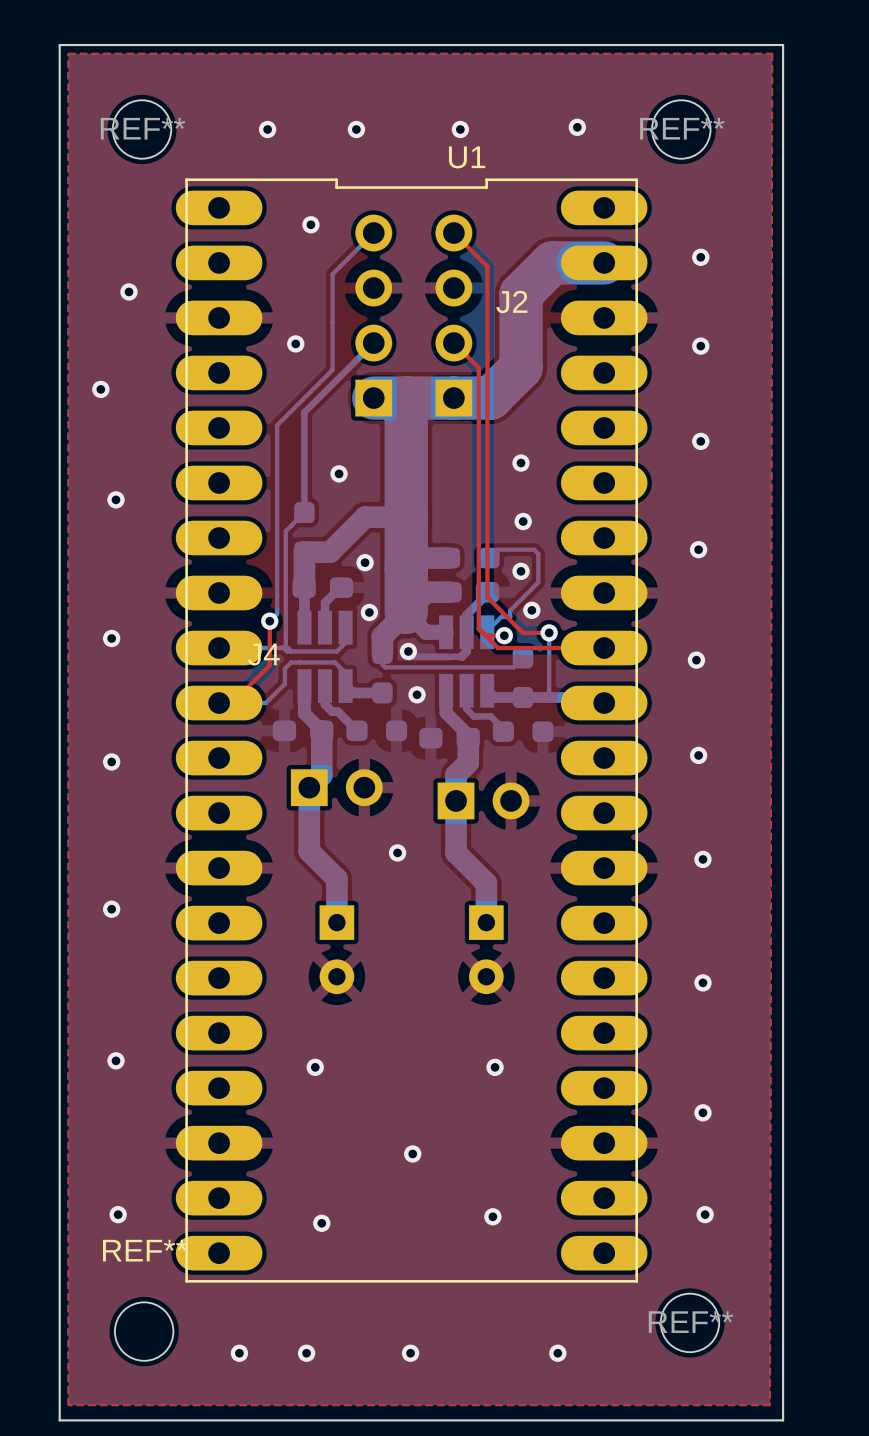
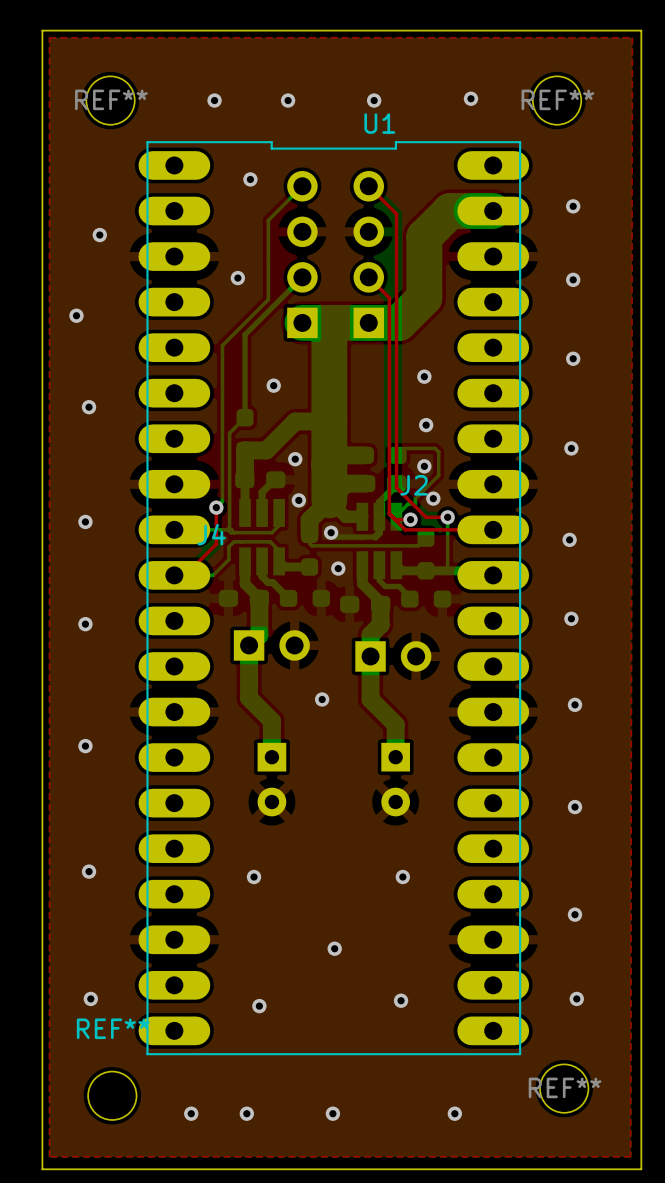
J2 name position: J2 (511, 301) -> J2 (414, 485)

